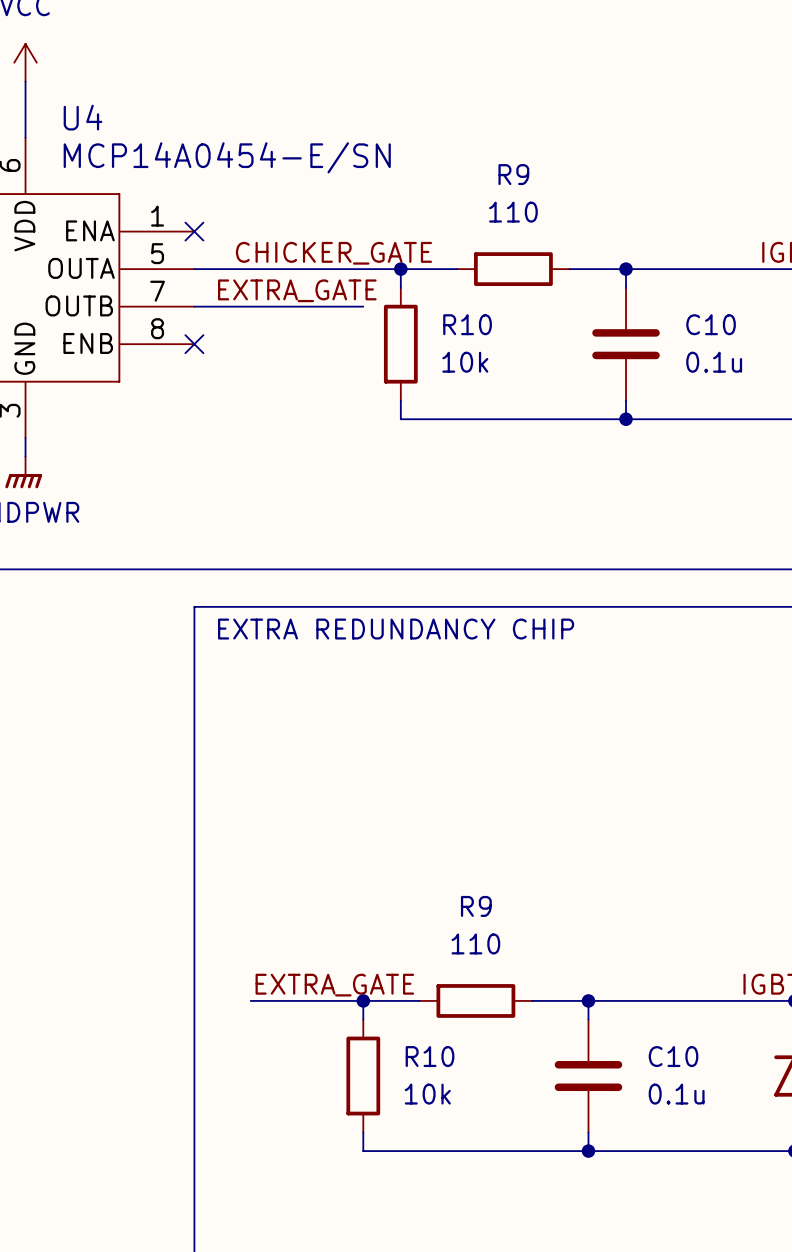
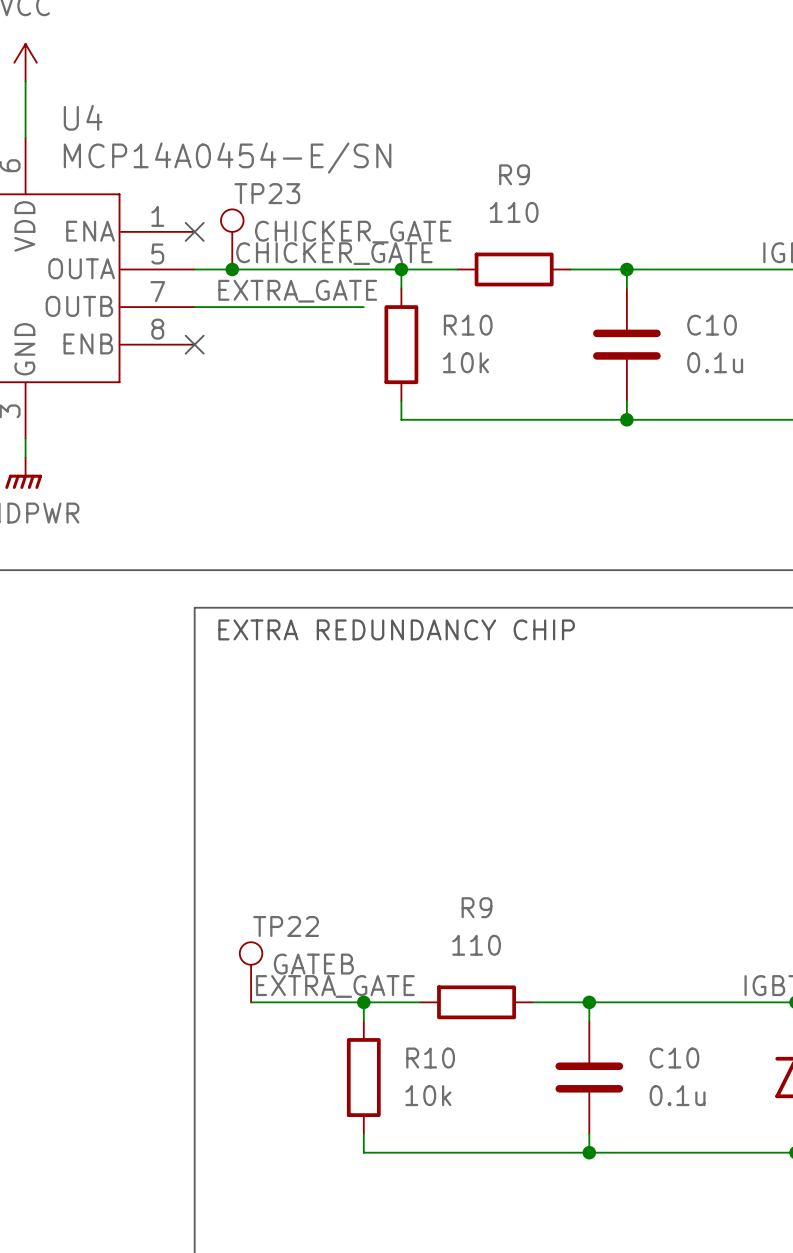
TP23: none -> CHICKER_GATE (232, 239)
junction: none -> (232, 269)
TP22: none -> GATEB (251, 972)

